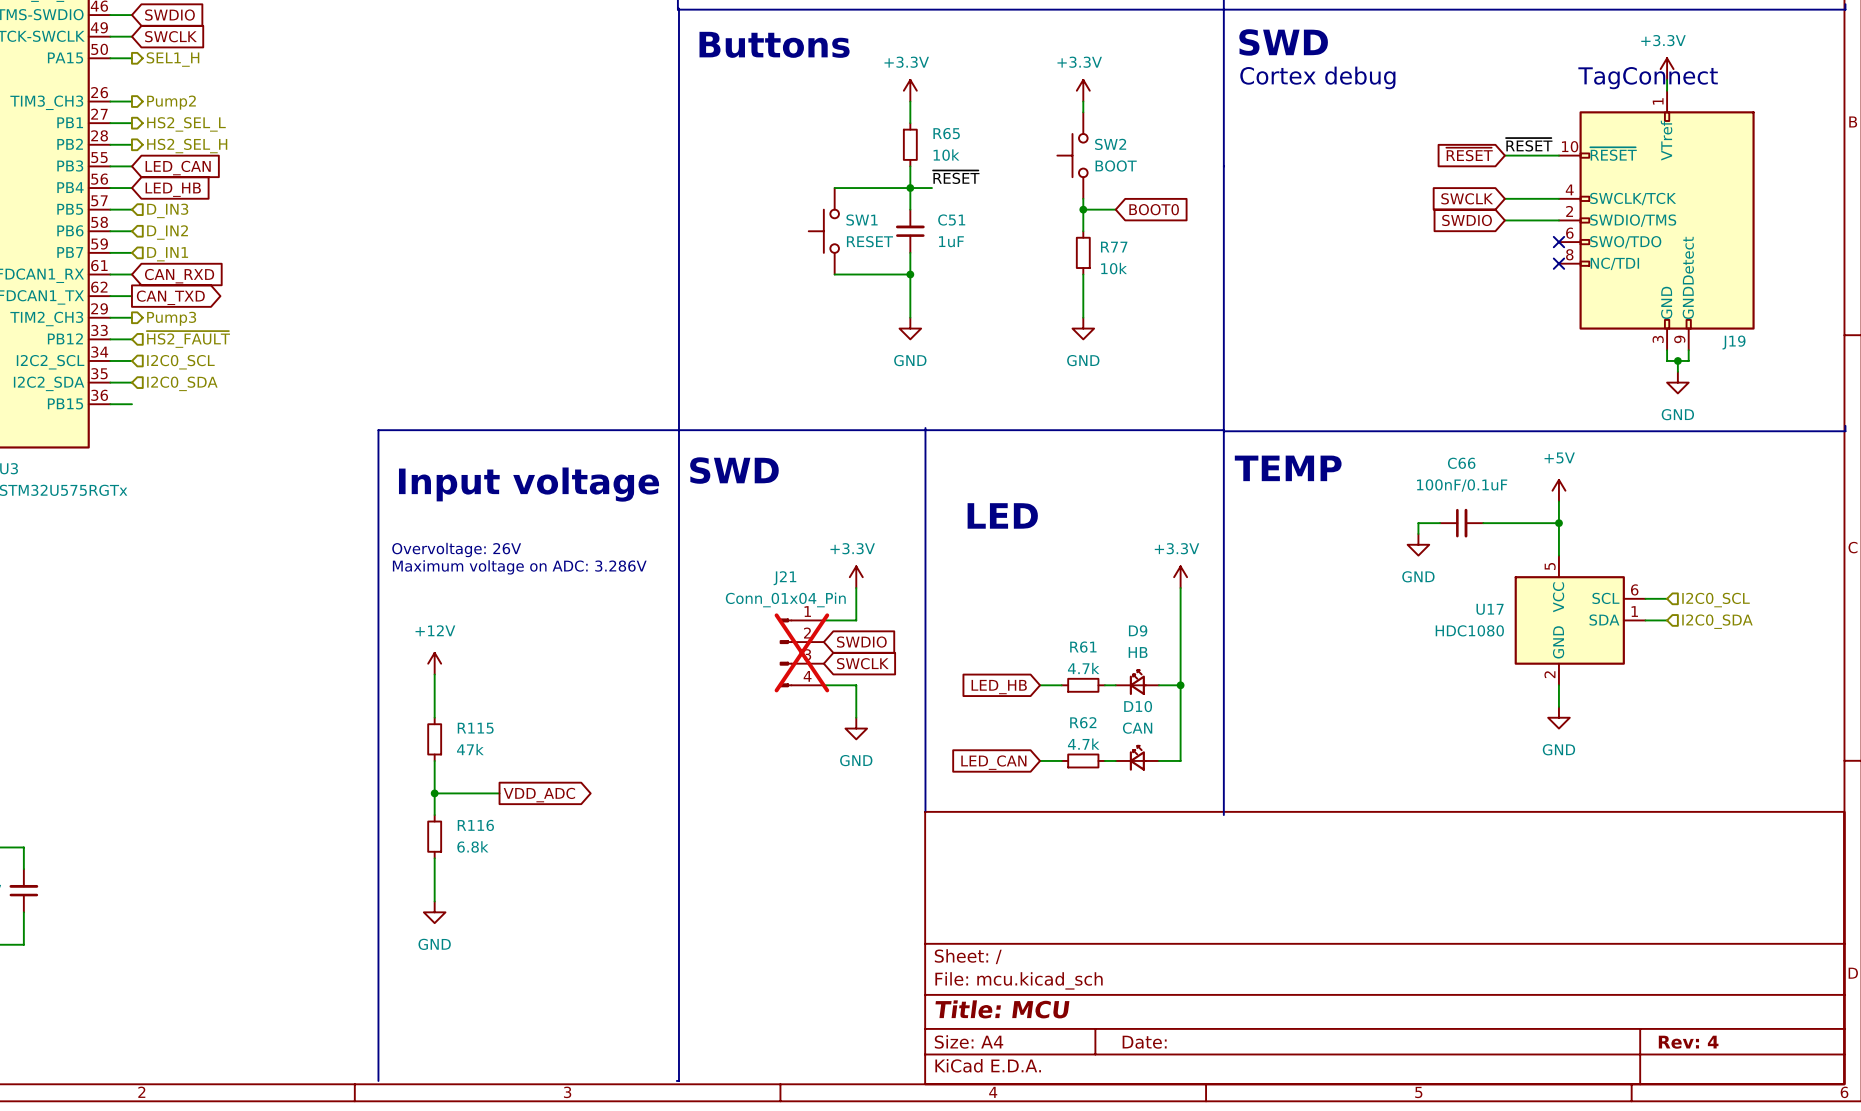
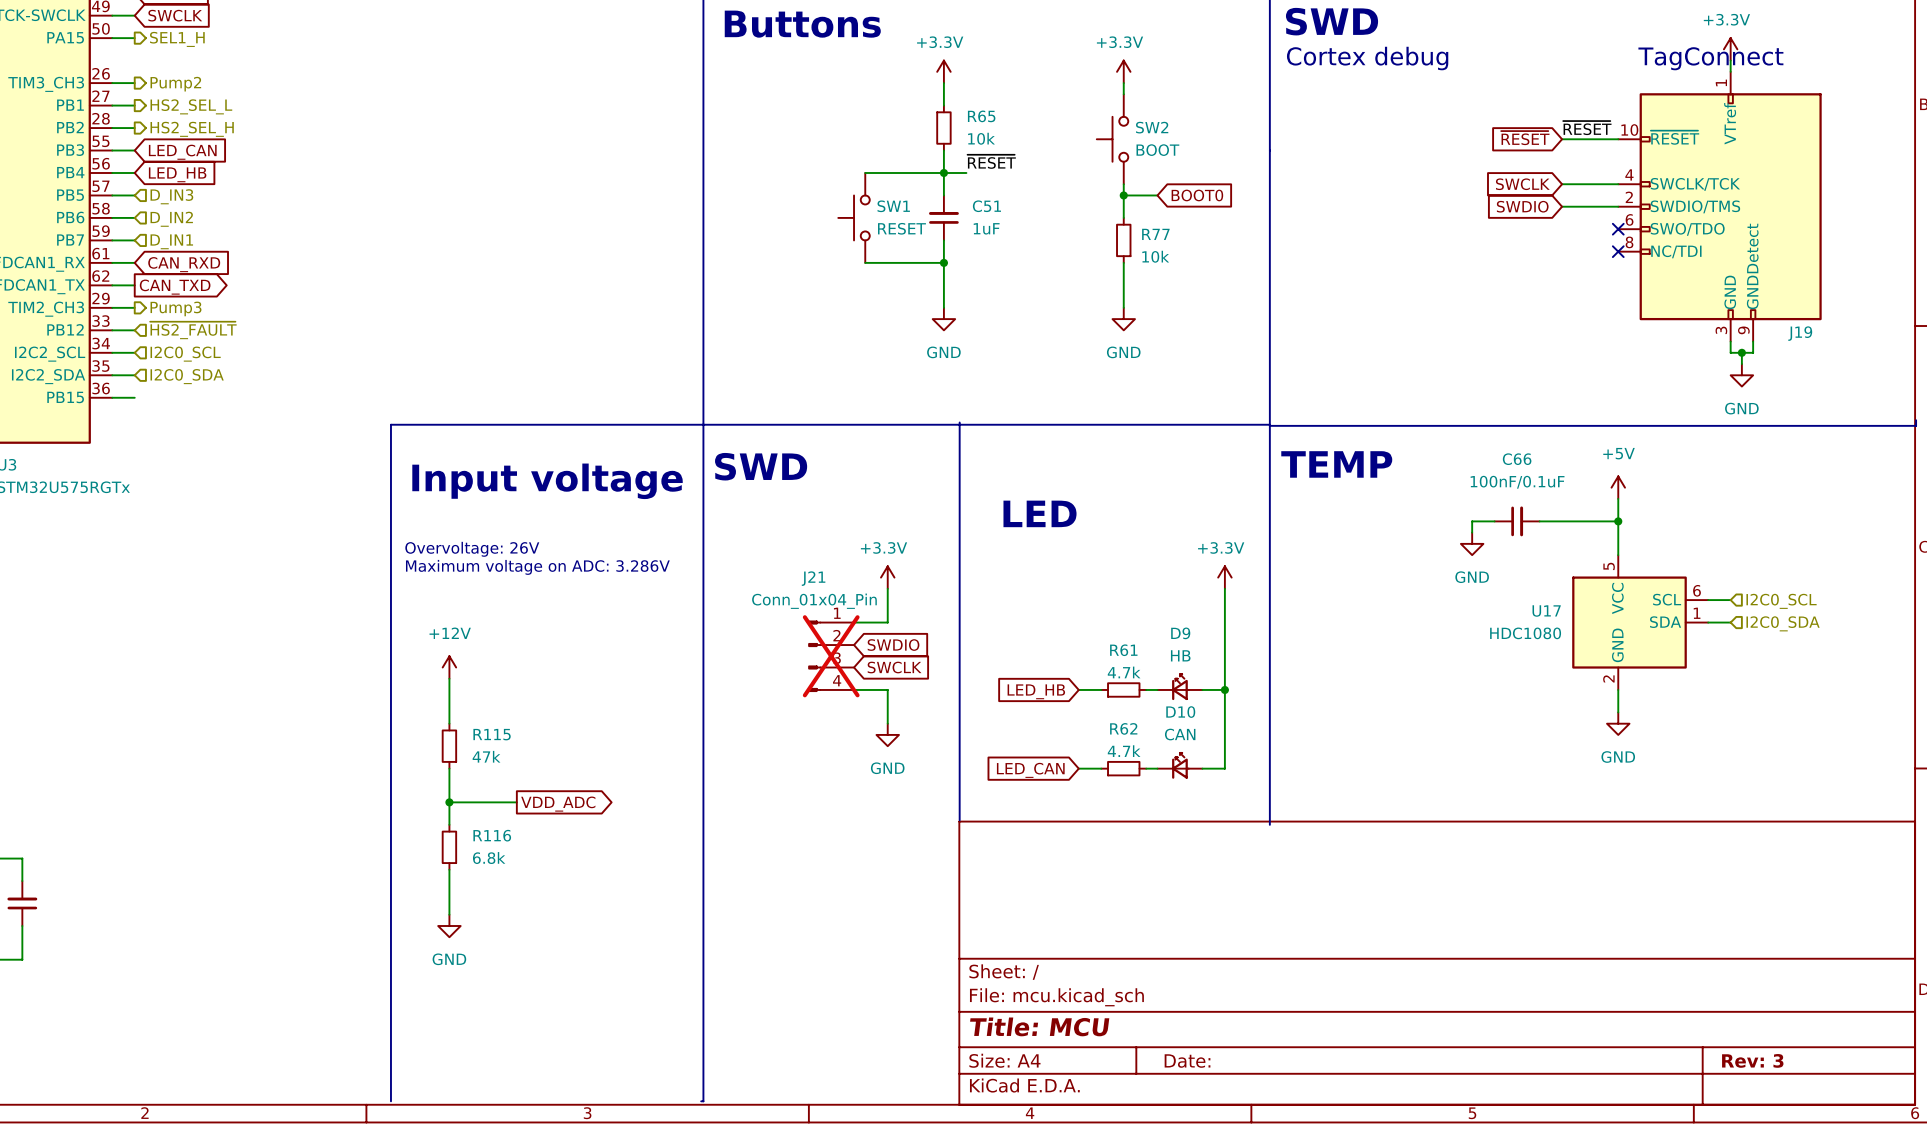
title block: Rev: 4 (1688, 1042) -> Rev: 3 (1752, 1060)

